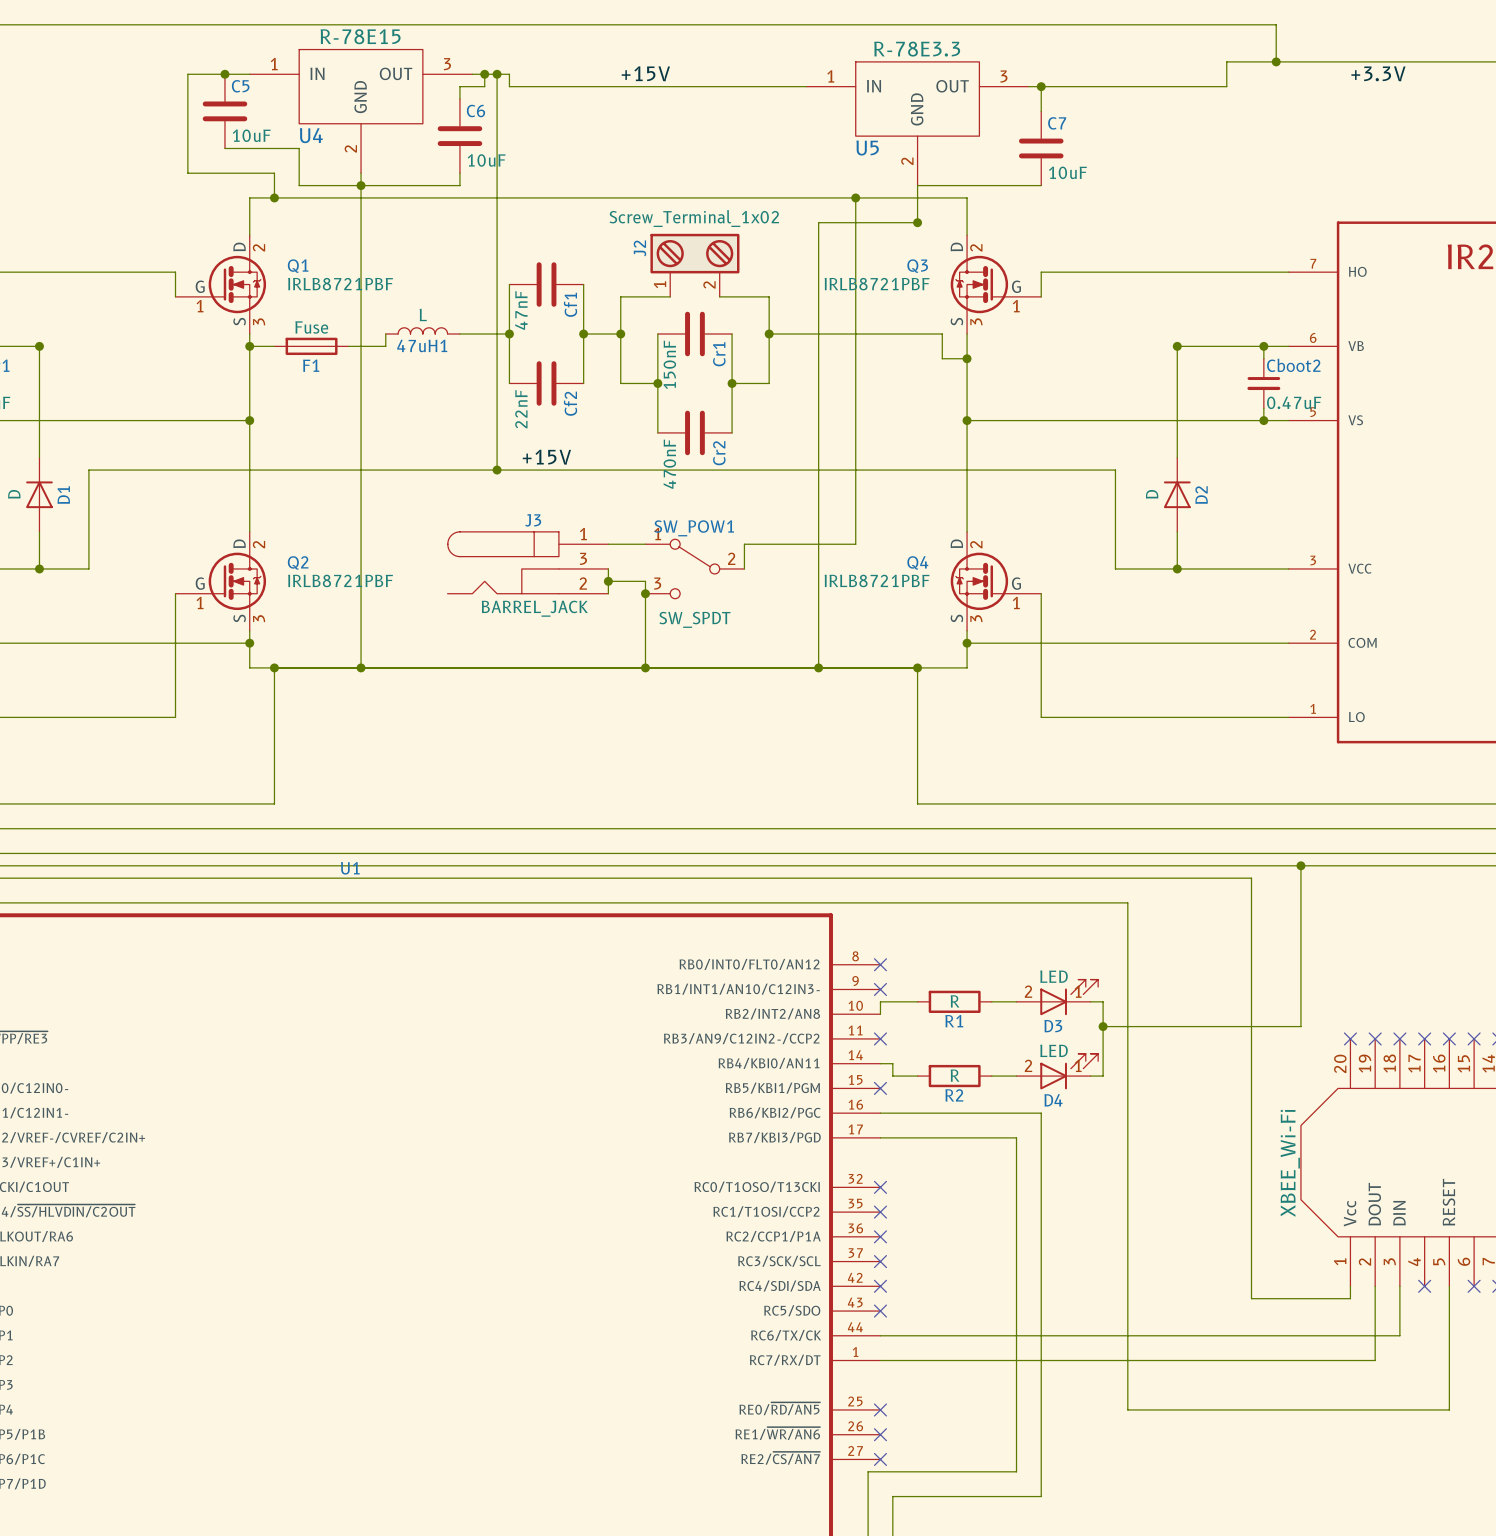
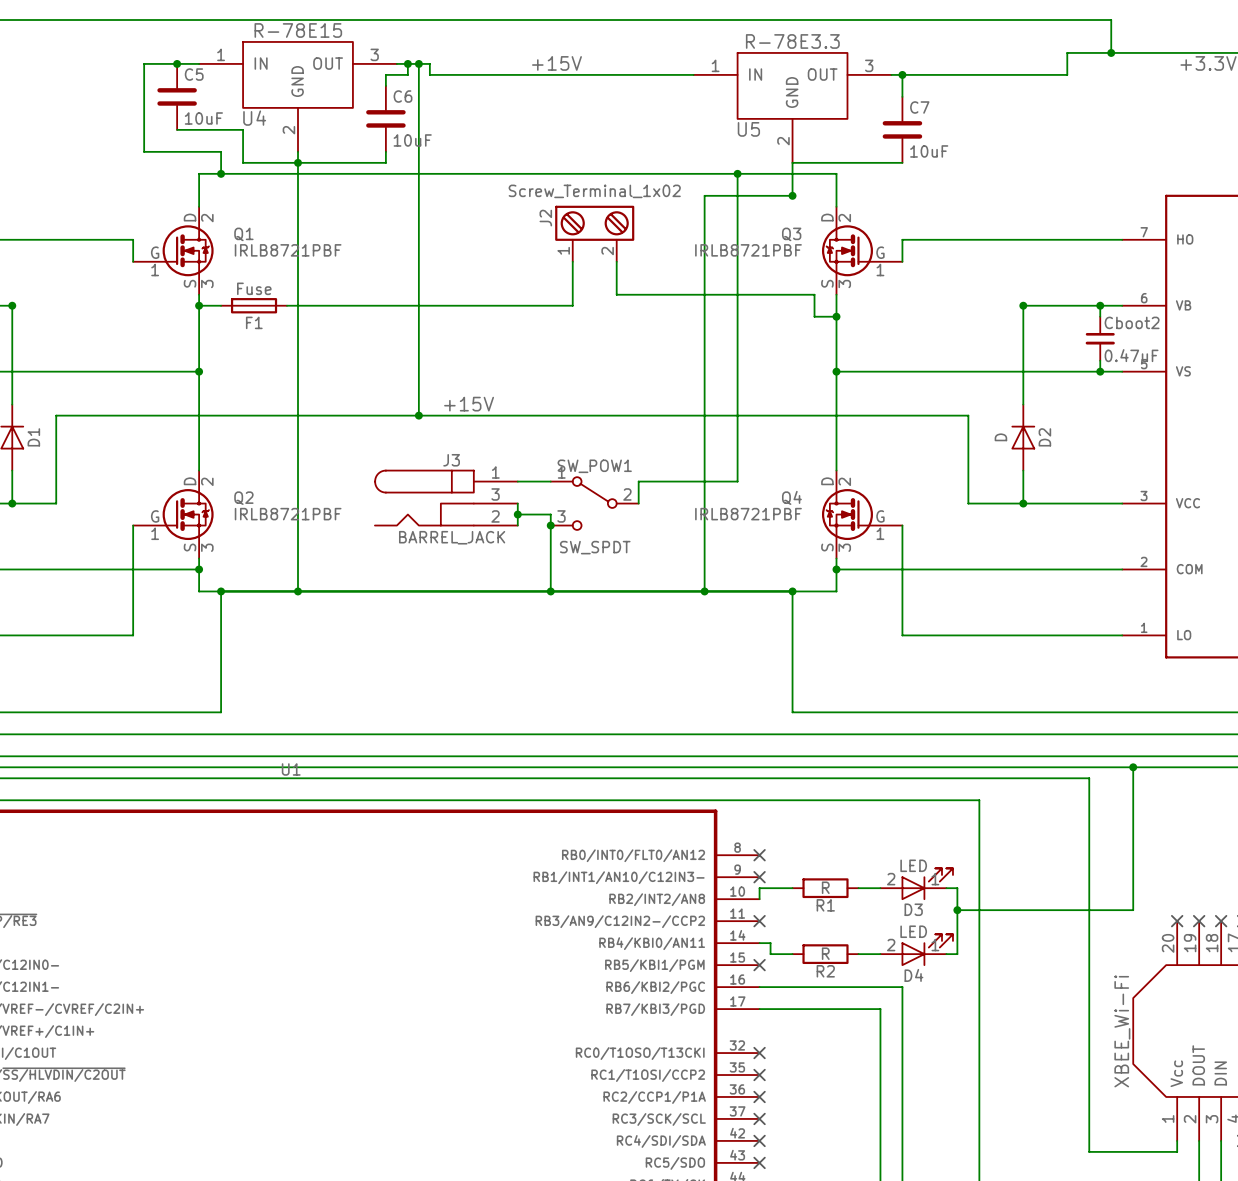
wire: (509, 284) (509, 383) -> none
Cf1: 47nF (546, 284) -> none
wire: (583, 284) (583, 383) -> none
wire: (670, 296) (620, 296) (620, 383) (657, 383) -> (572, 261) (572, 305) (319, 305)
wire: (719, 296) (769, 296) (769, 383) (732, 383) -> (616, 261) (616, 294) (660, 294)
47uH1: L (422, 330) -> none
wire: (385, 334) (385, 346) -> none
wire: (459, 334) (509, 334) -> none
junction: (509, 334) -> none
wire: (583, 334) (620, 334) -> none
junction: (583, 334) -> none
junction: (620, 334) -> none
wire: (657, 334) (657, 432) -> none
Cr1: 150nF (694, 334) -> none
wire: (732, 334) (732, 432) -> none
junction: (769, 334) -> none
Cf2: 22nF (546, 383) -> none
junction: (657, 383) -> none
junction: (732, 383) -> none
Cr2: 470nF (694, 432) -> none

